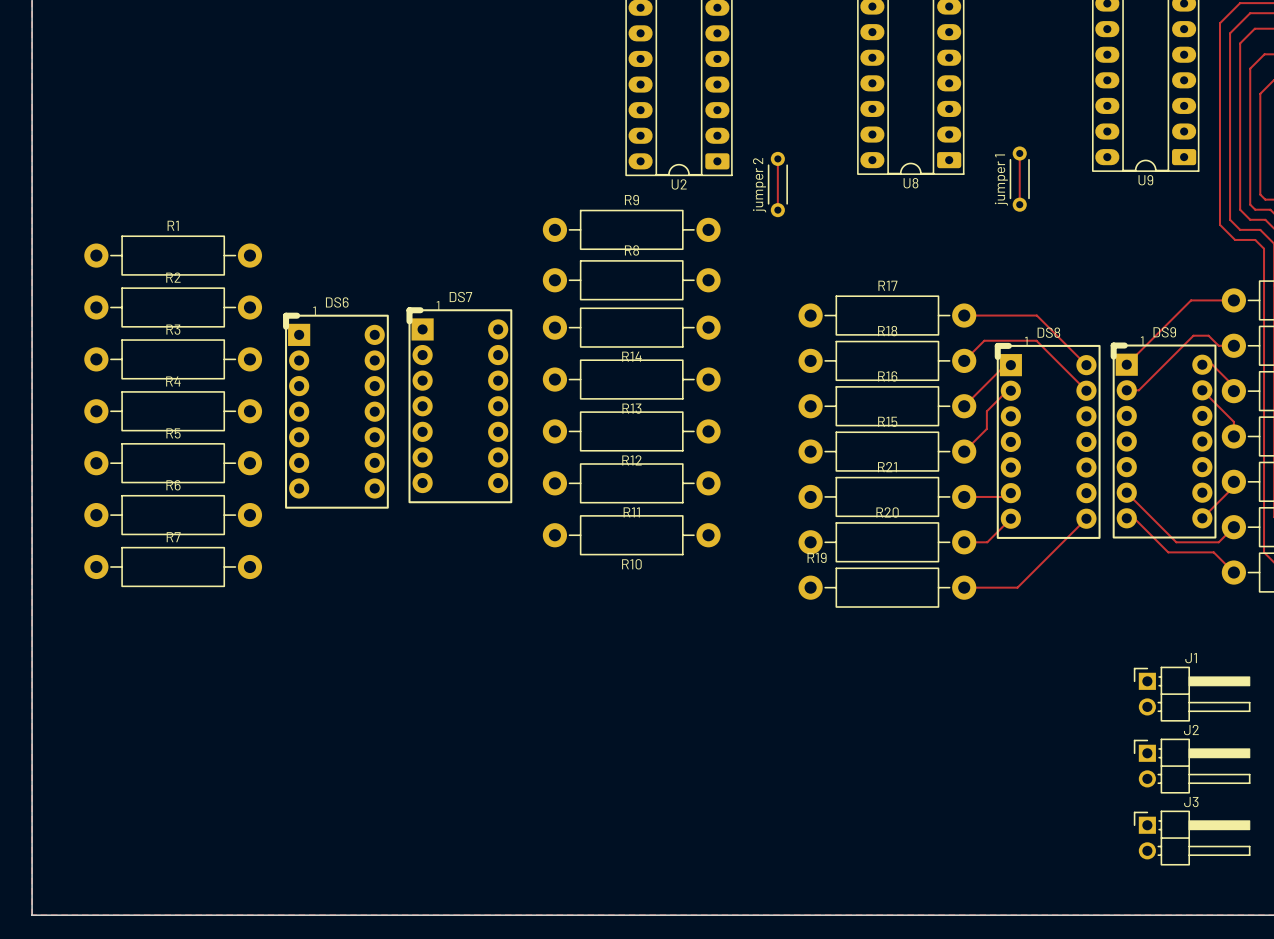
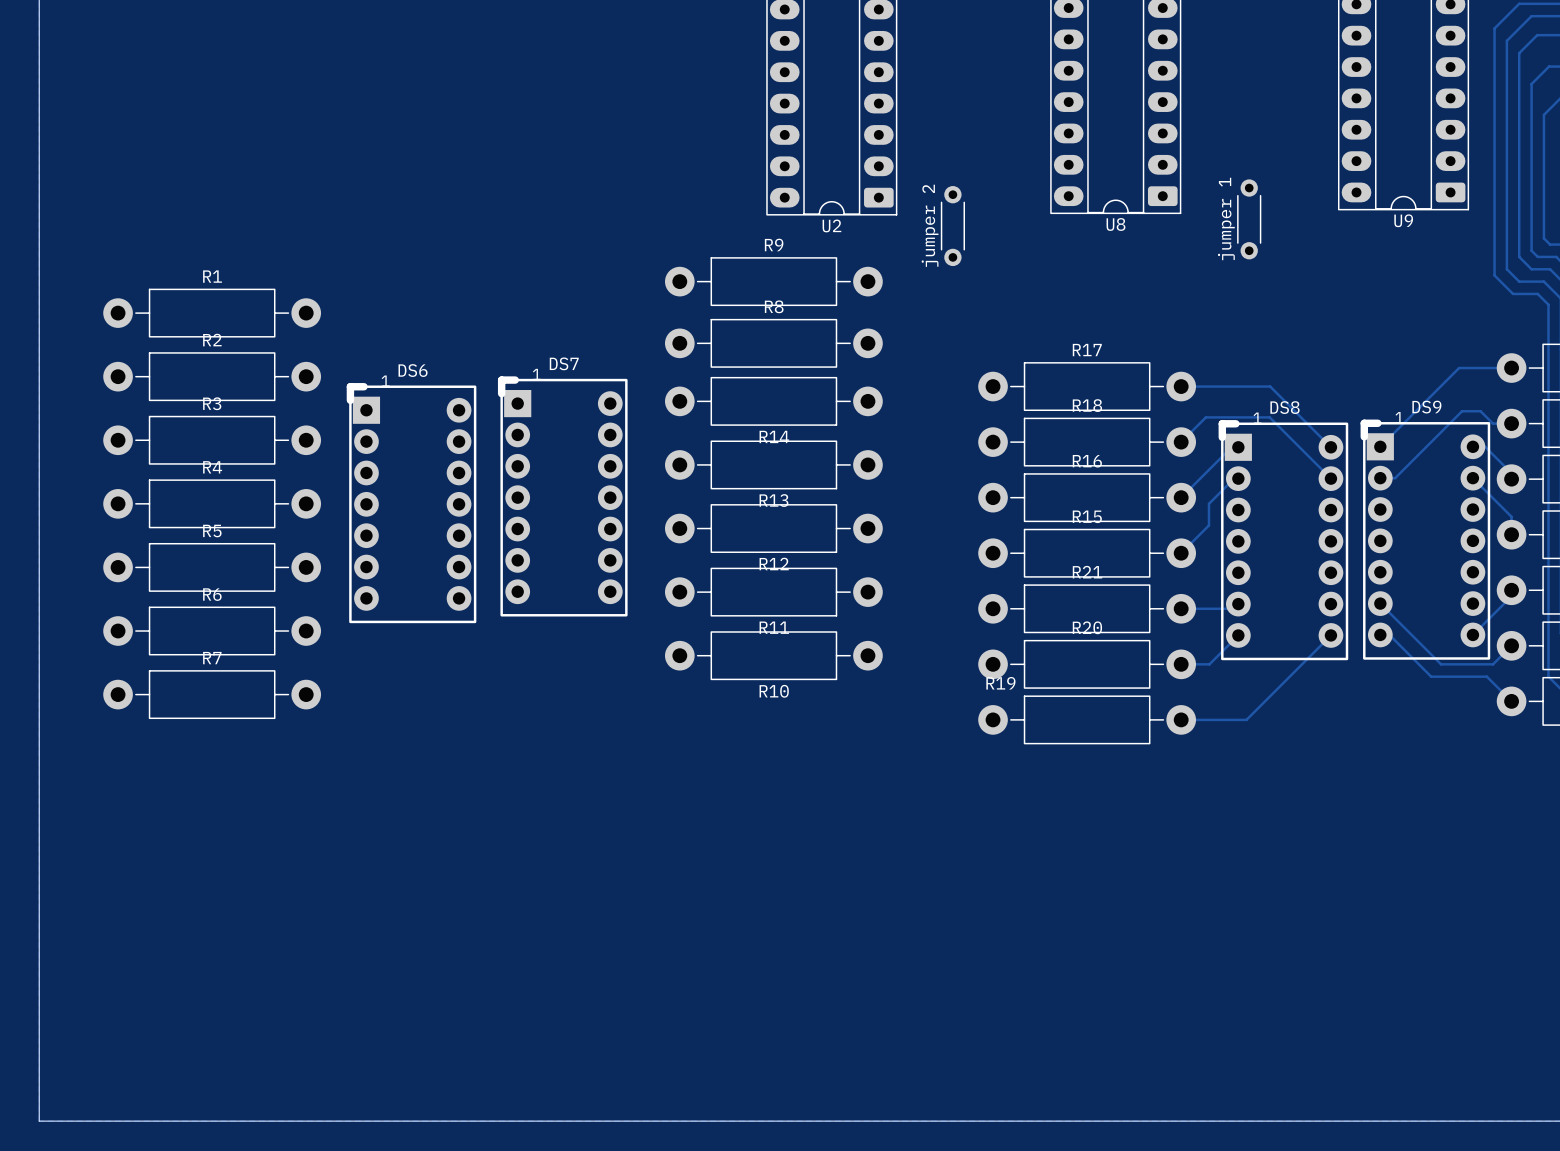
track: (1019, 153) (1019, 204) -> none
track: (777, 158) (777, 210) -> none
J1: (1192, 694) -> none
J2: (1192, 766) -> none
J3: (1192, 838) -> none

